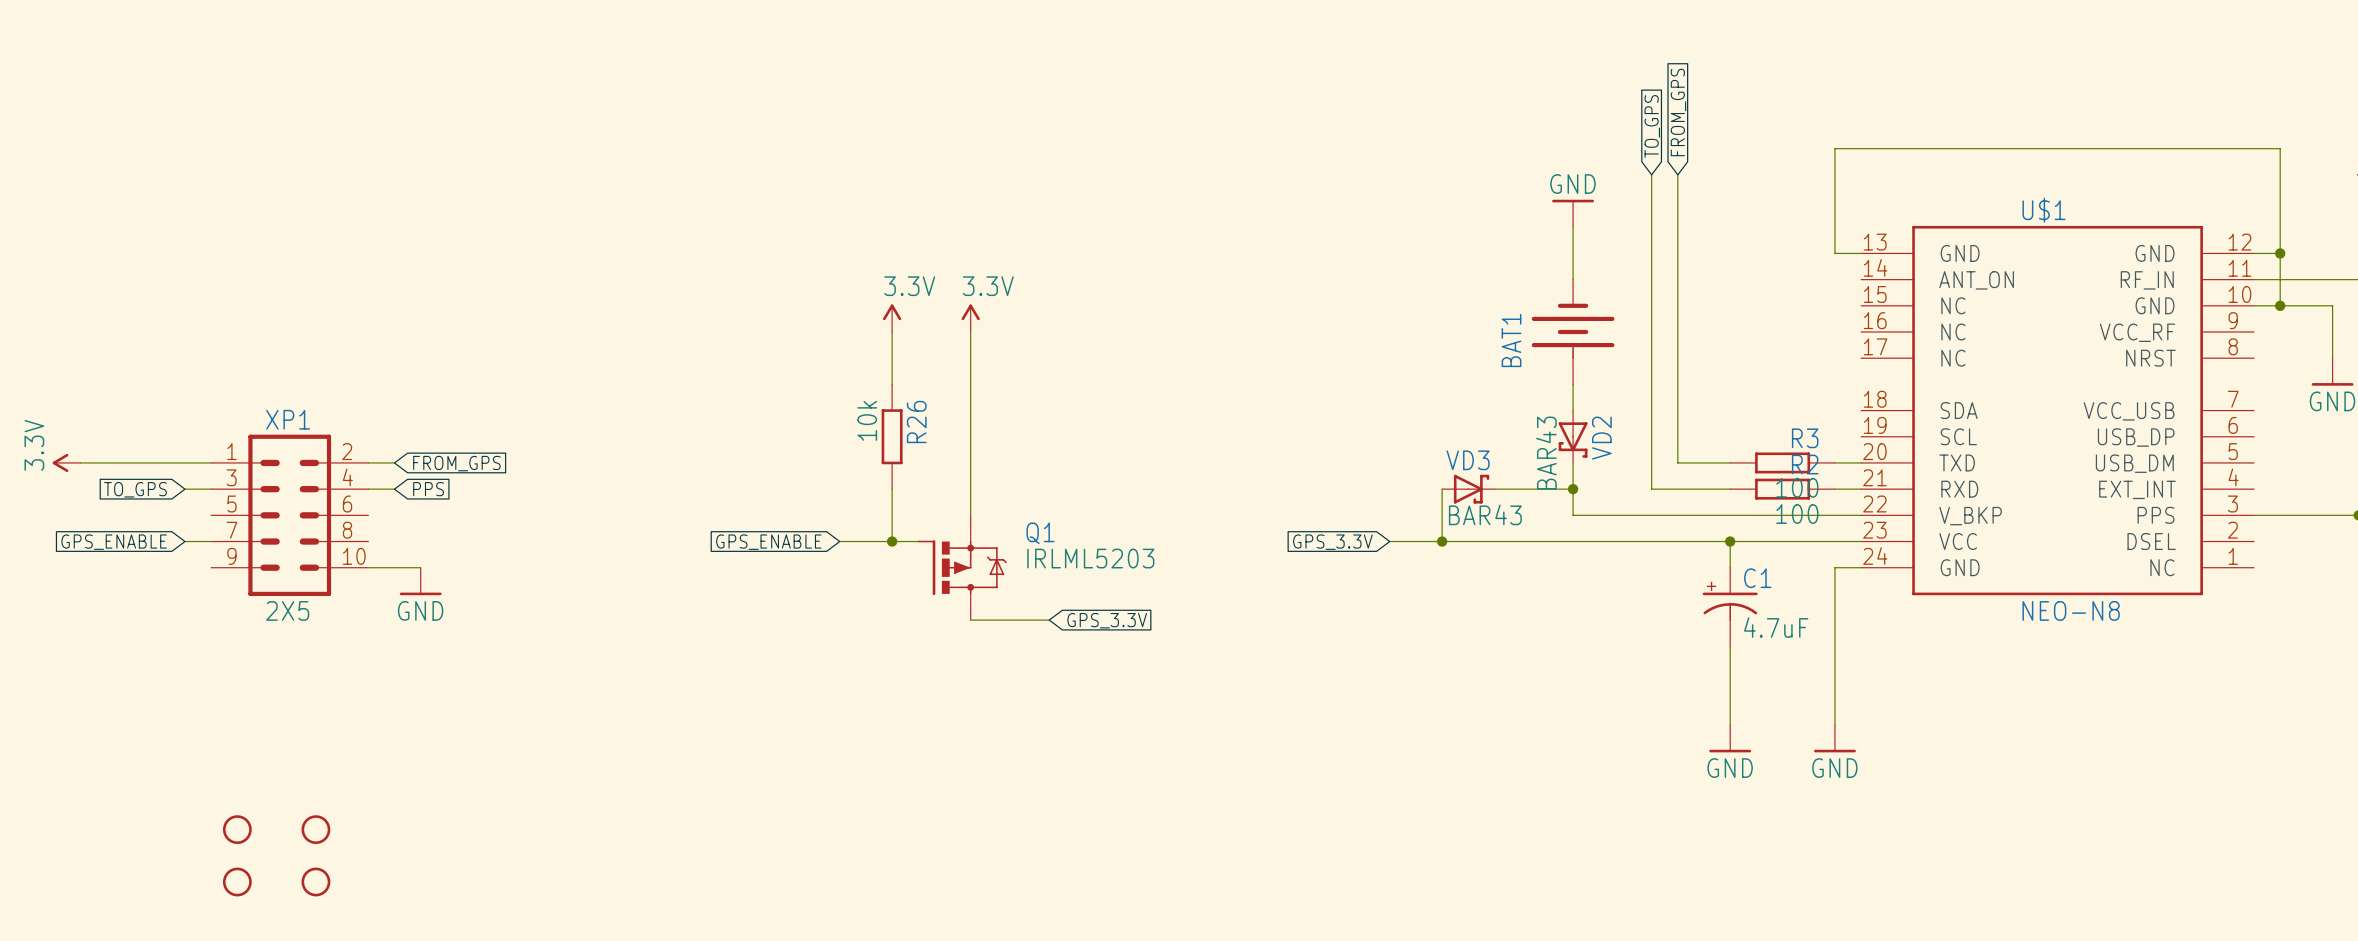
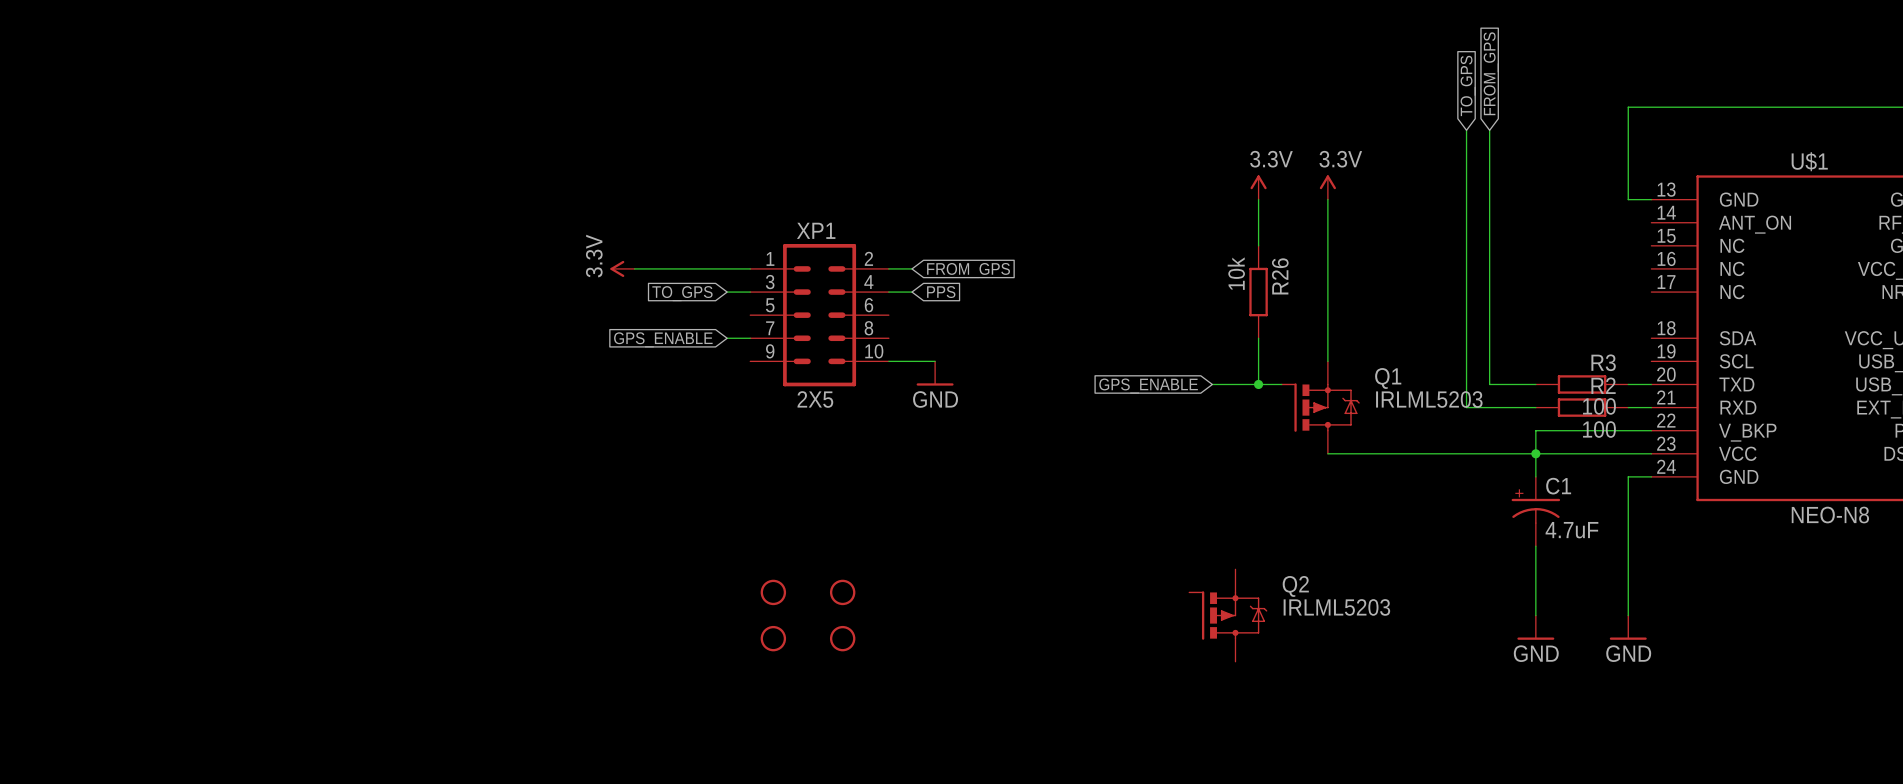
power symbol: GND (1573, 213) -> none
wire: (1573, 227) (1573, 279) -> (1258, 199) (1258, 245)
power symbol: none -> 3.3V (1258, 187)
power symbol: none -> 3.3V (1327, 187)
wire: none -> (1327, 199) (1327, 361)
power symbol: 3.3V (892, 318) -> none
power symbol: 3.3V (970, 318) -> none
power symbol: none -> 3.3V (622, 268)
wire: none -> (634, 268) (750, 268)
wire: (892, 332) (892, 384) -> none
wire: (970, 332) (970, 515) -> none
wire: none -> (888, 268) (911, 268)
global label: none -> FROM_GPS (968, 270)
BAT1: (1573, 332) -> none
global label: none -> TO_GPS (682, 293)
wire: none -> (727, 292) (750, 292)
wire: none -> (888, 292) (911, 292)
global label: none -> PPS (941, 292)
wire: (1573, 384) (1573, 410) -> none
wire: none -> (727, 338) (750, 338)
R26 position: (892, 436) -> (1258, 292)
wire: none -> (888, 361) (935, 361)
VD2: BAR43 (1573, 436) -> none
power symbol: none -> GND (935, 373)
power symbol: 3.3V (66, 462) -> none
wire: (80, 462) (211, 462) -> none
wire: (368, 462) (394, 462) -> none
junction: none -> (1258, 384)
wire: (1573, 462) (1573, 515) (1730, 515) -> (1535, 453) (1535, 430)
global label: FROM_GPS (456, 463) -> none
global label: none -> GPS_ENABLE (1148, 386)
global label: TO_GPS (135, 489) -> none
wire: (184, 489) (211, 489) -> none
wire: (368, 489) (394, 489) -> none
global label: PPS (428, 489) -> none
wire: (892, 489) (892, 541) -> none
wire: (1442, 489) (1442, 541) -> (1258, 338) (1258, 384)
VD3: BAR43 (1468, 489) -> none
wire: (1494, 489) (1573, 489) -> (1212, 384) (1281, 384)
junction: (1573, 489) -> none
XP1 position: (289, 515) -> (819, 315)
wire: (184, 541) (211, 541) -> none
wire: (839, 541) (918, 541) -> none
junction: (892, 541) -> none
wire: (1389, 541) (1494, 541) -> none
junction: (1442, 541) -> none
global label: GPS_ENABLE (114, 542) -> none
global label position: GPS_ENABLE (768, 542) -> GPS_ENABLE (663, 339)
global label: GPS_3.3V (1332, 542) -> none
wire: (368, 567) (420, 567) -> none
Q1 position: (962, 567) -> (1320, 407)
power symbol: GND (420, 581) -> none
wire: (970, 620) (1049, 620) -> none
global label: GPS_3.3V (1107, 620) -> none
part: none -> (773, 592)
part: none -> (842, 592)
Q2: none -> IRLML5203 (1227, 615)
part: none -> (773, 638)
part: none -> (842, 638)
part: (237, 829) -> none
part: (315, 829) -> none
part: (237, 882) -> none
part: (315, 882) -> none

